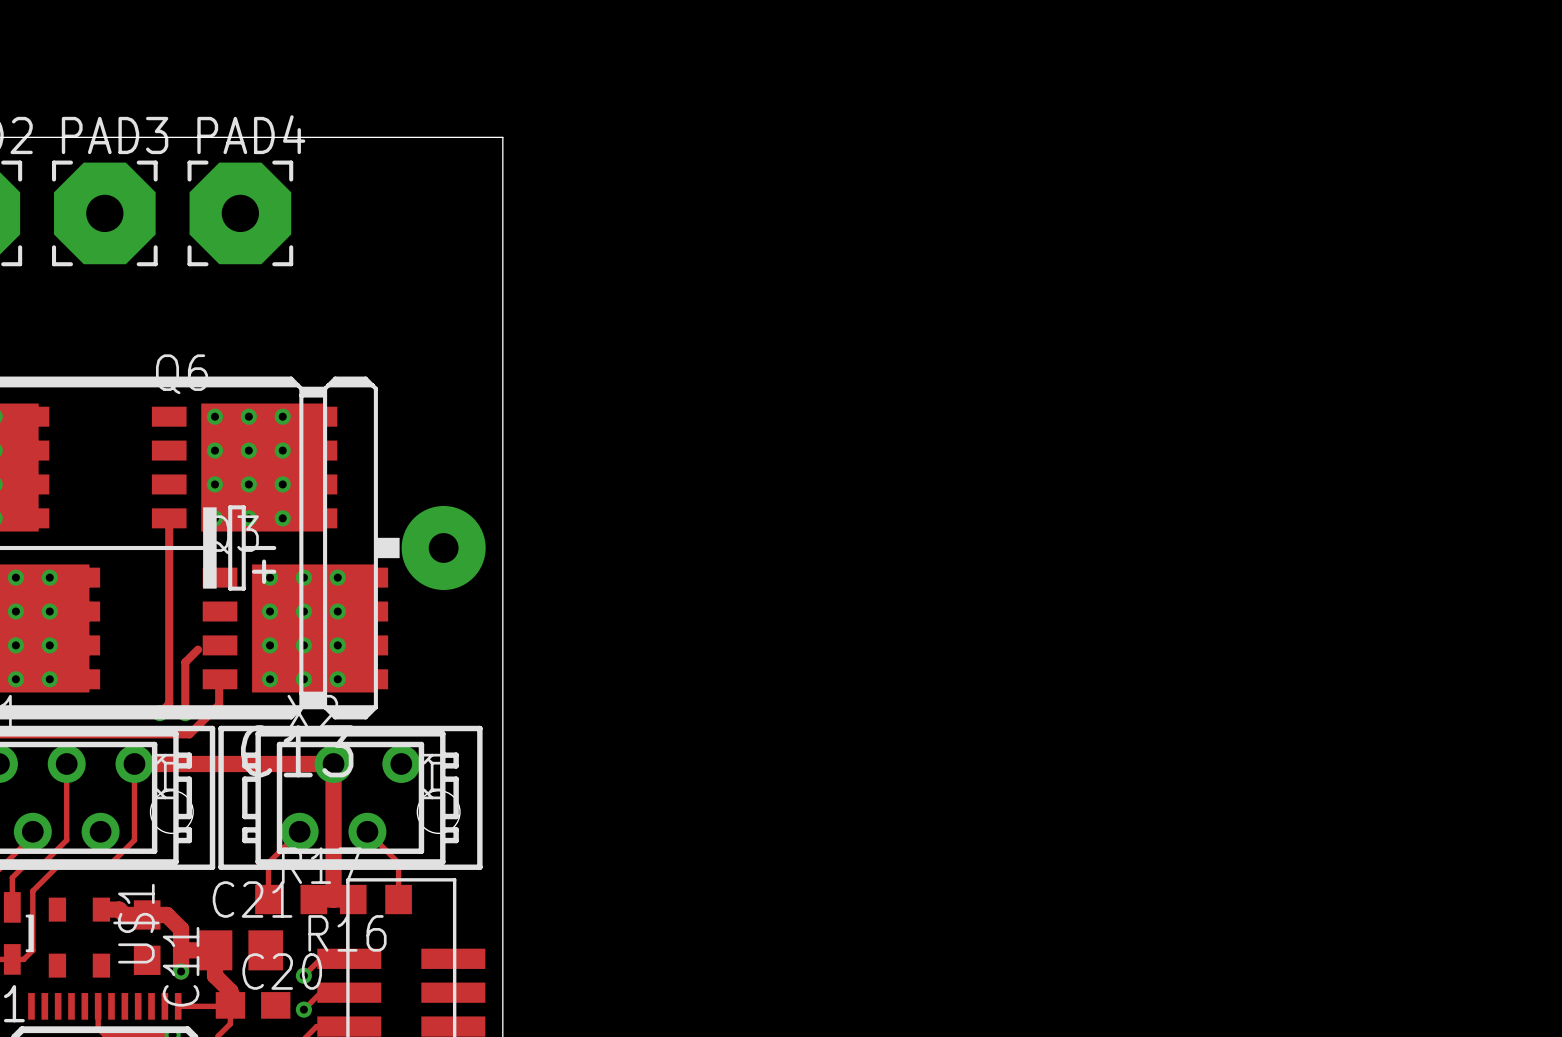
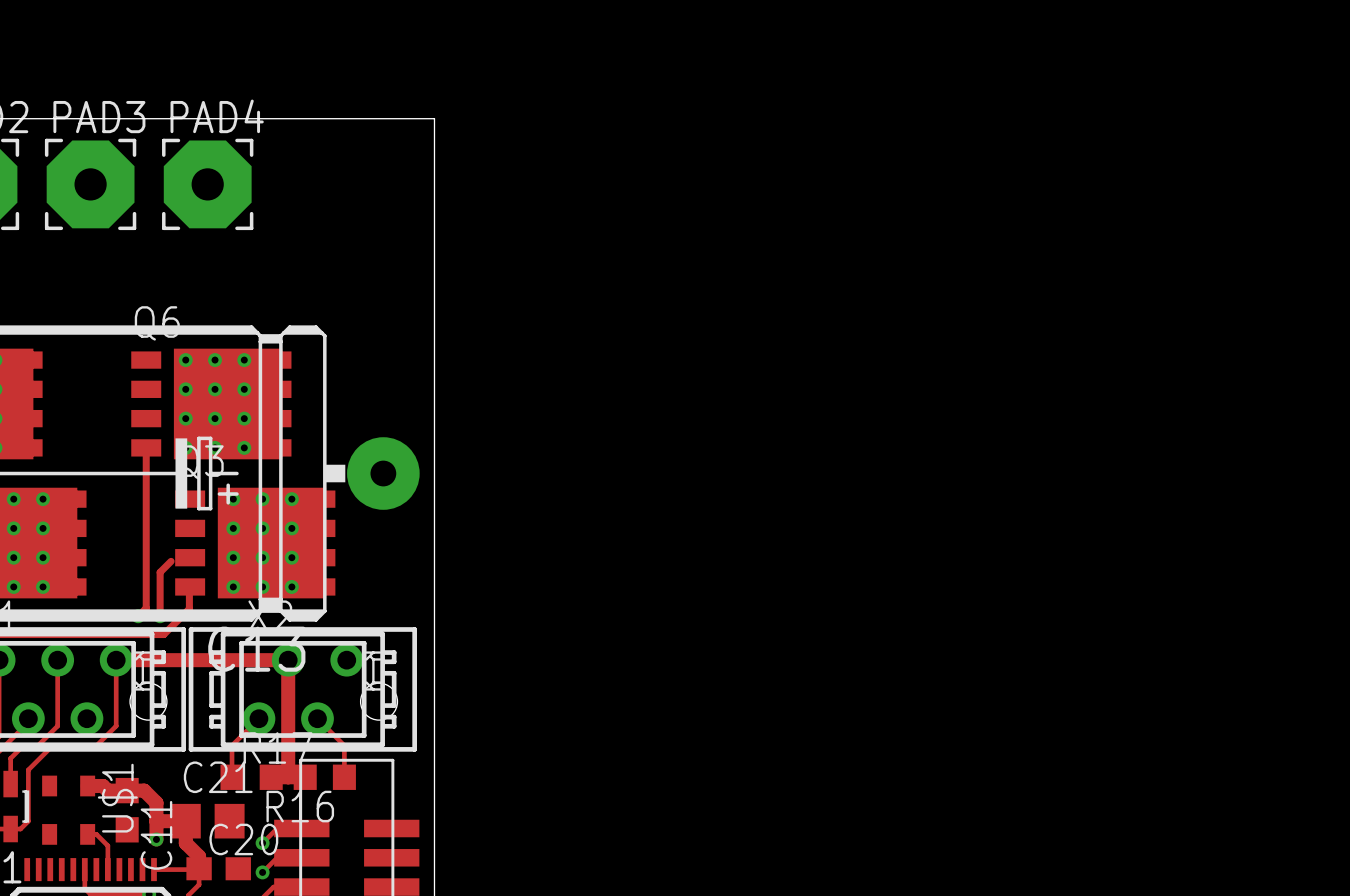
track: none -> (87, 834) (96, 834) (107, 845) (107, 869)

